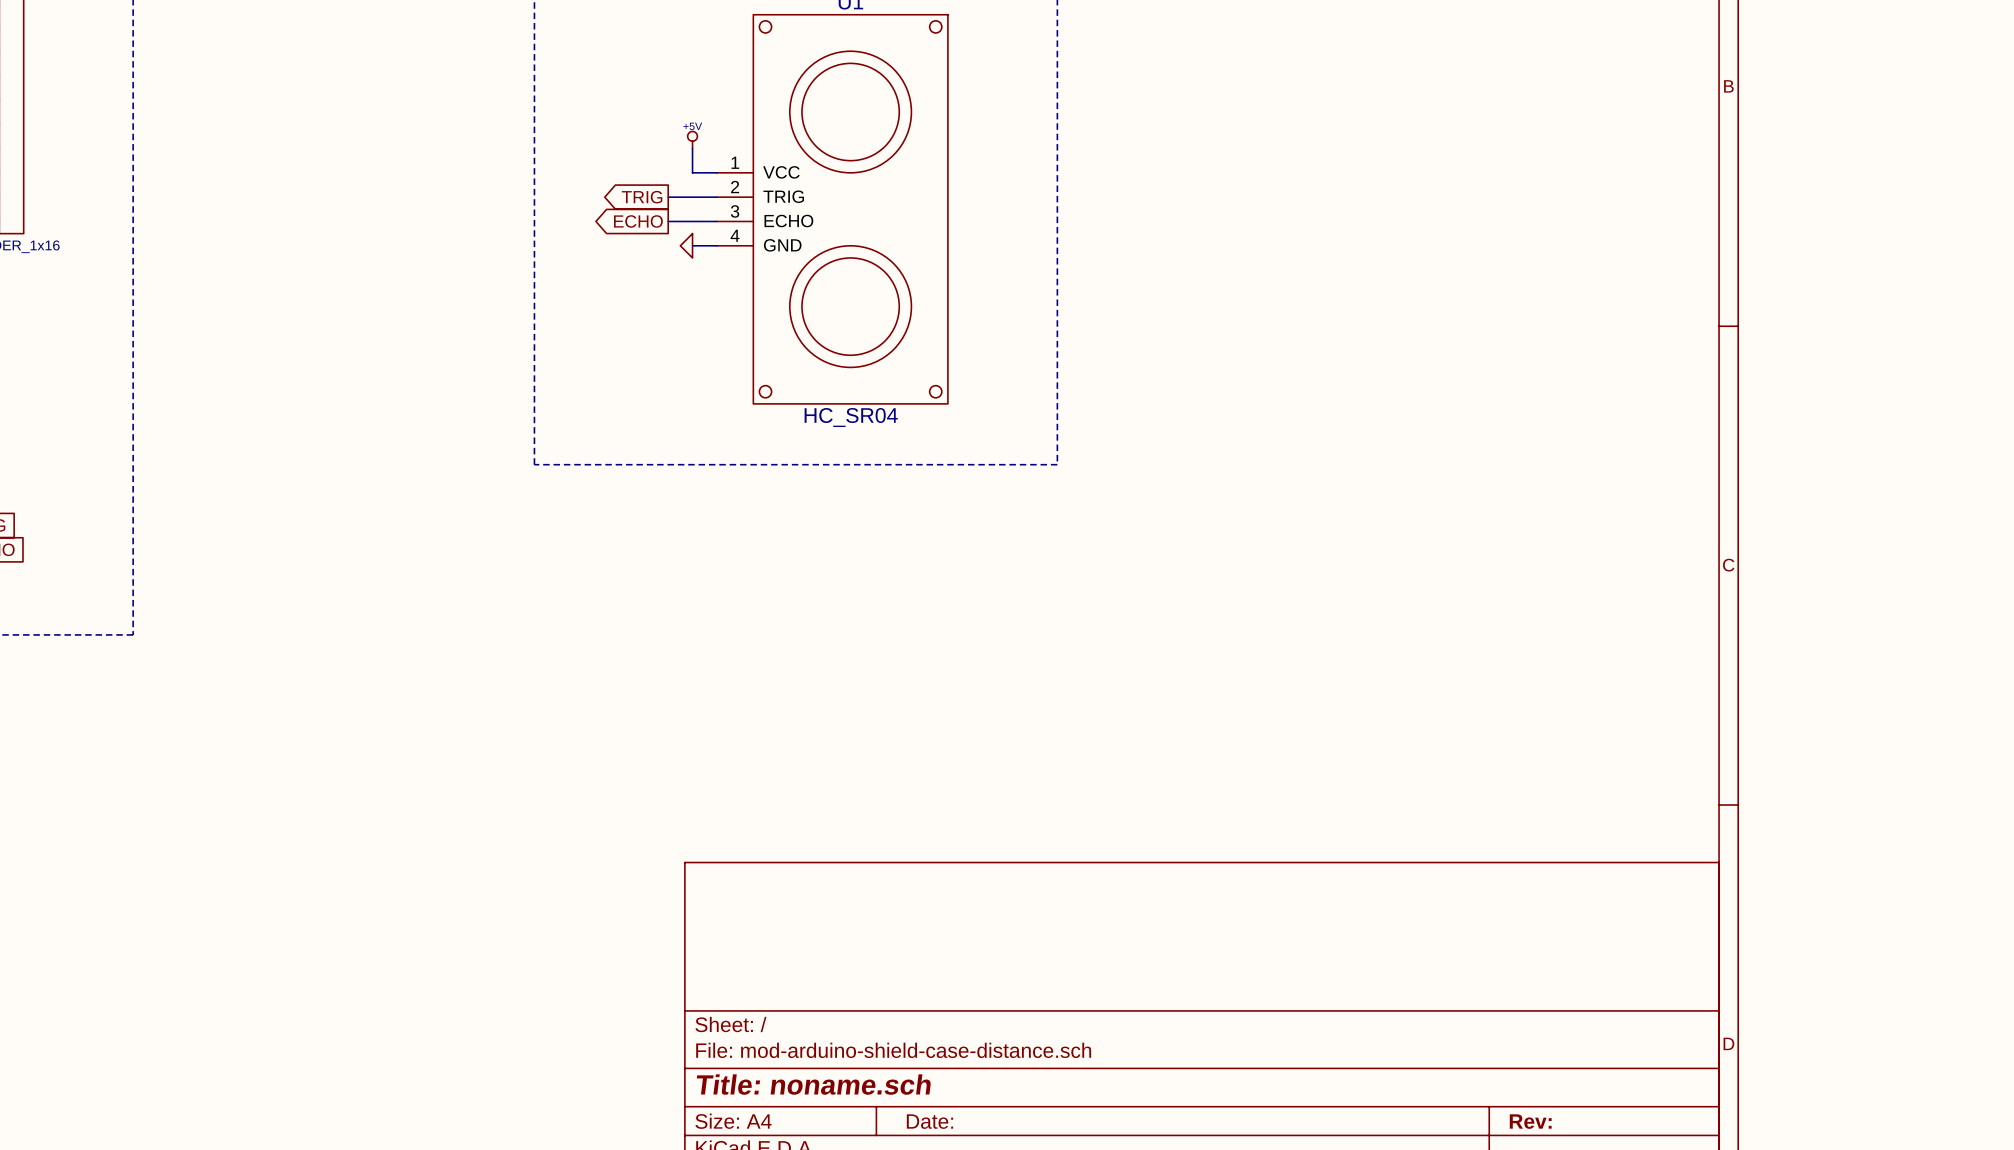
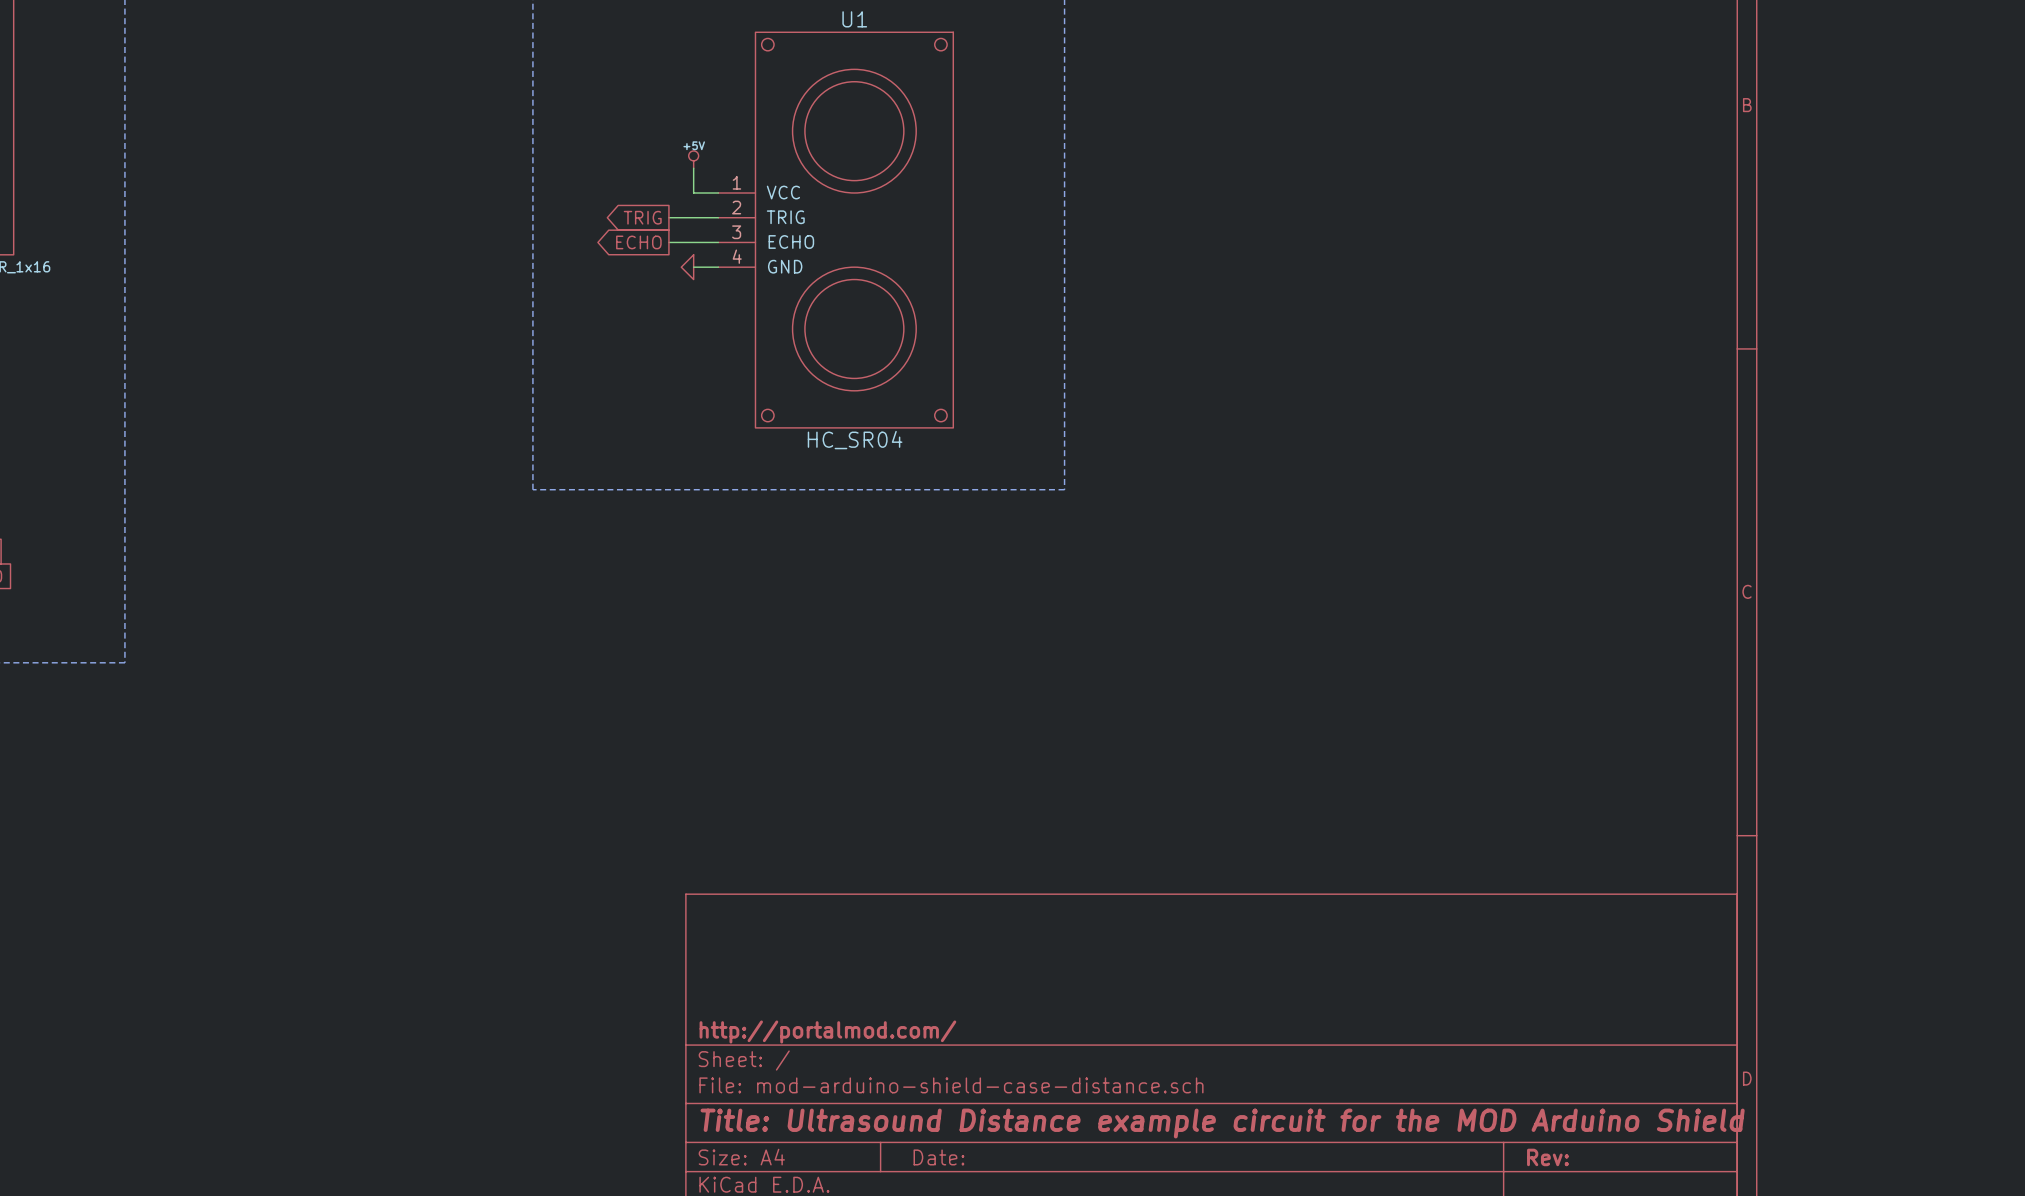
title block: none -> http://portalmod.com/ (827, 1032)
title block: Title: noname.sch (813, 1084) -> Title: Ultrasound Distance example circuit for the MOD Arduino Shield (1222, 1123)

